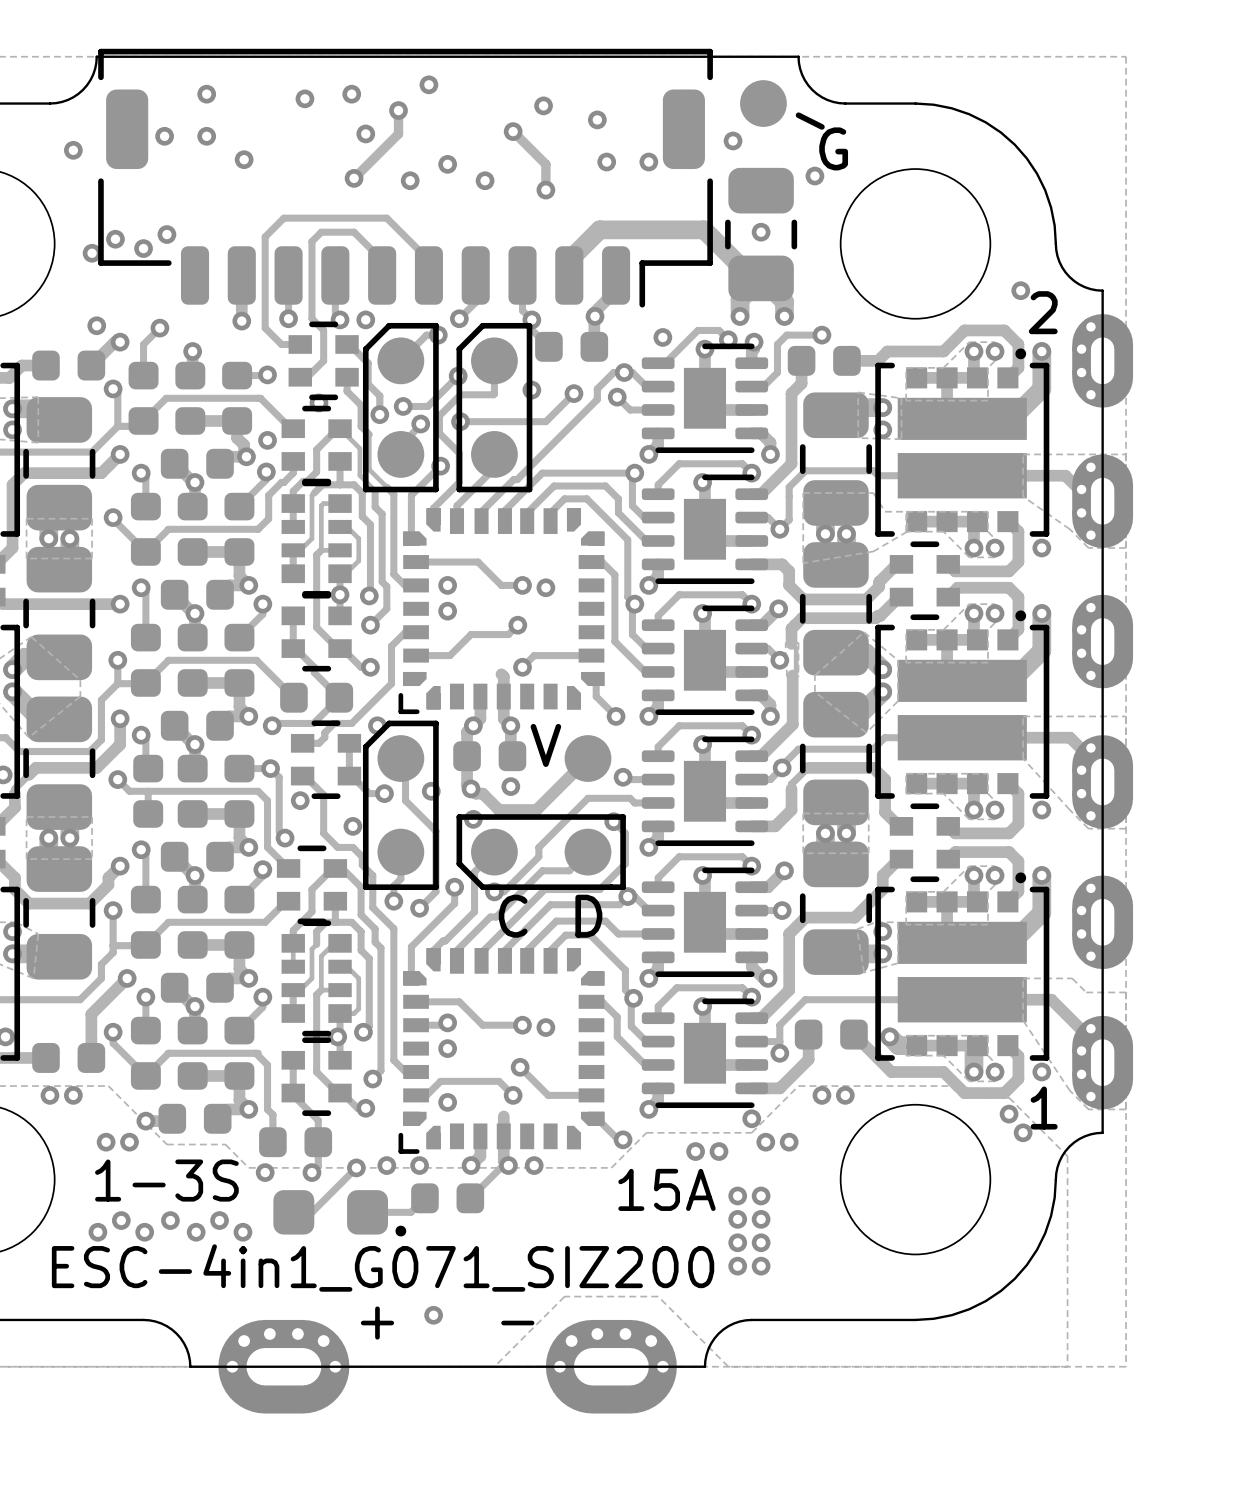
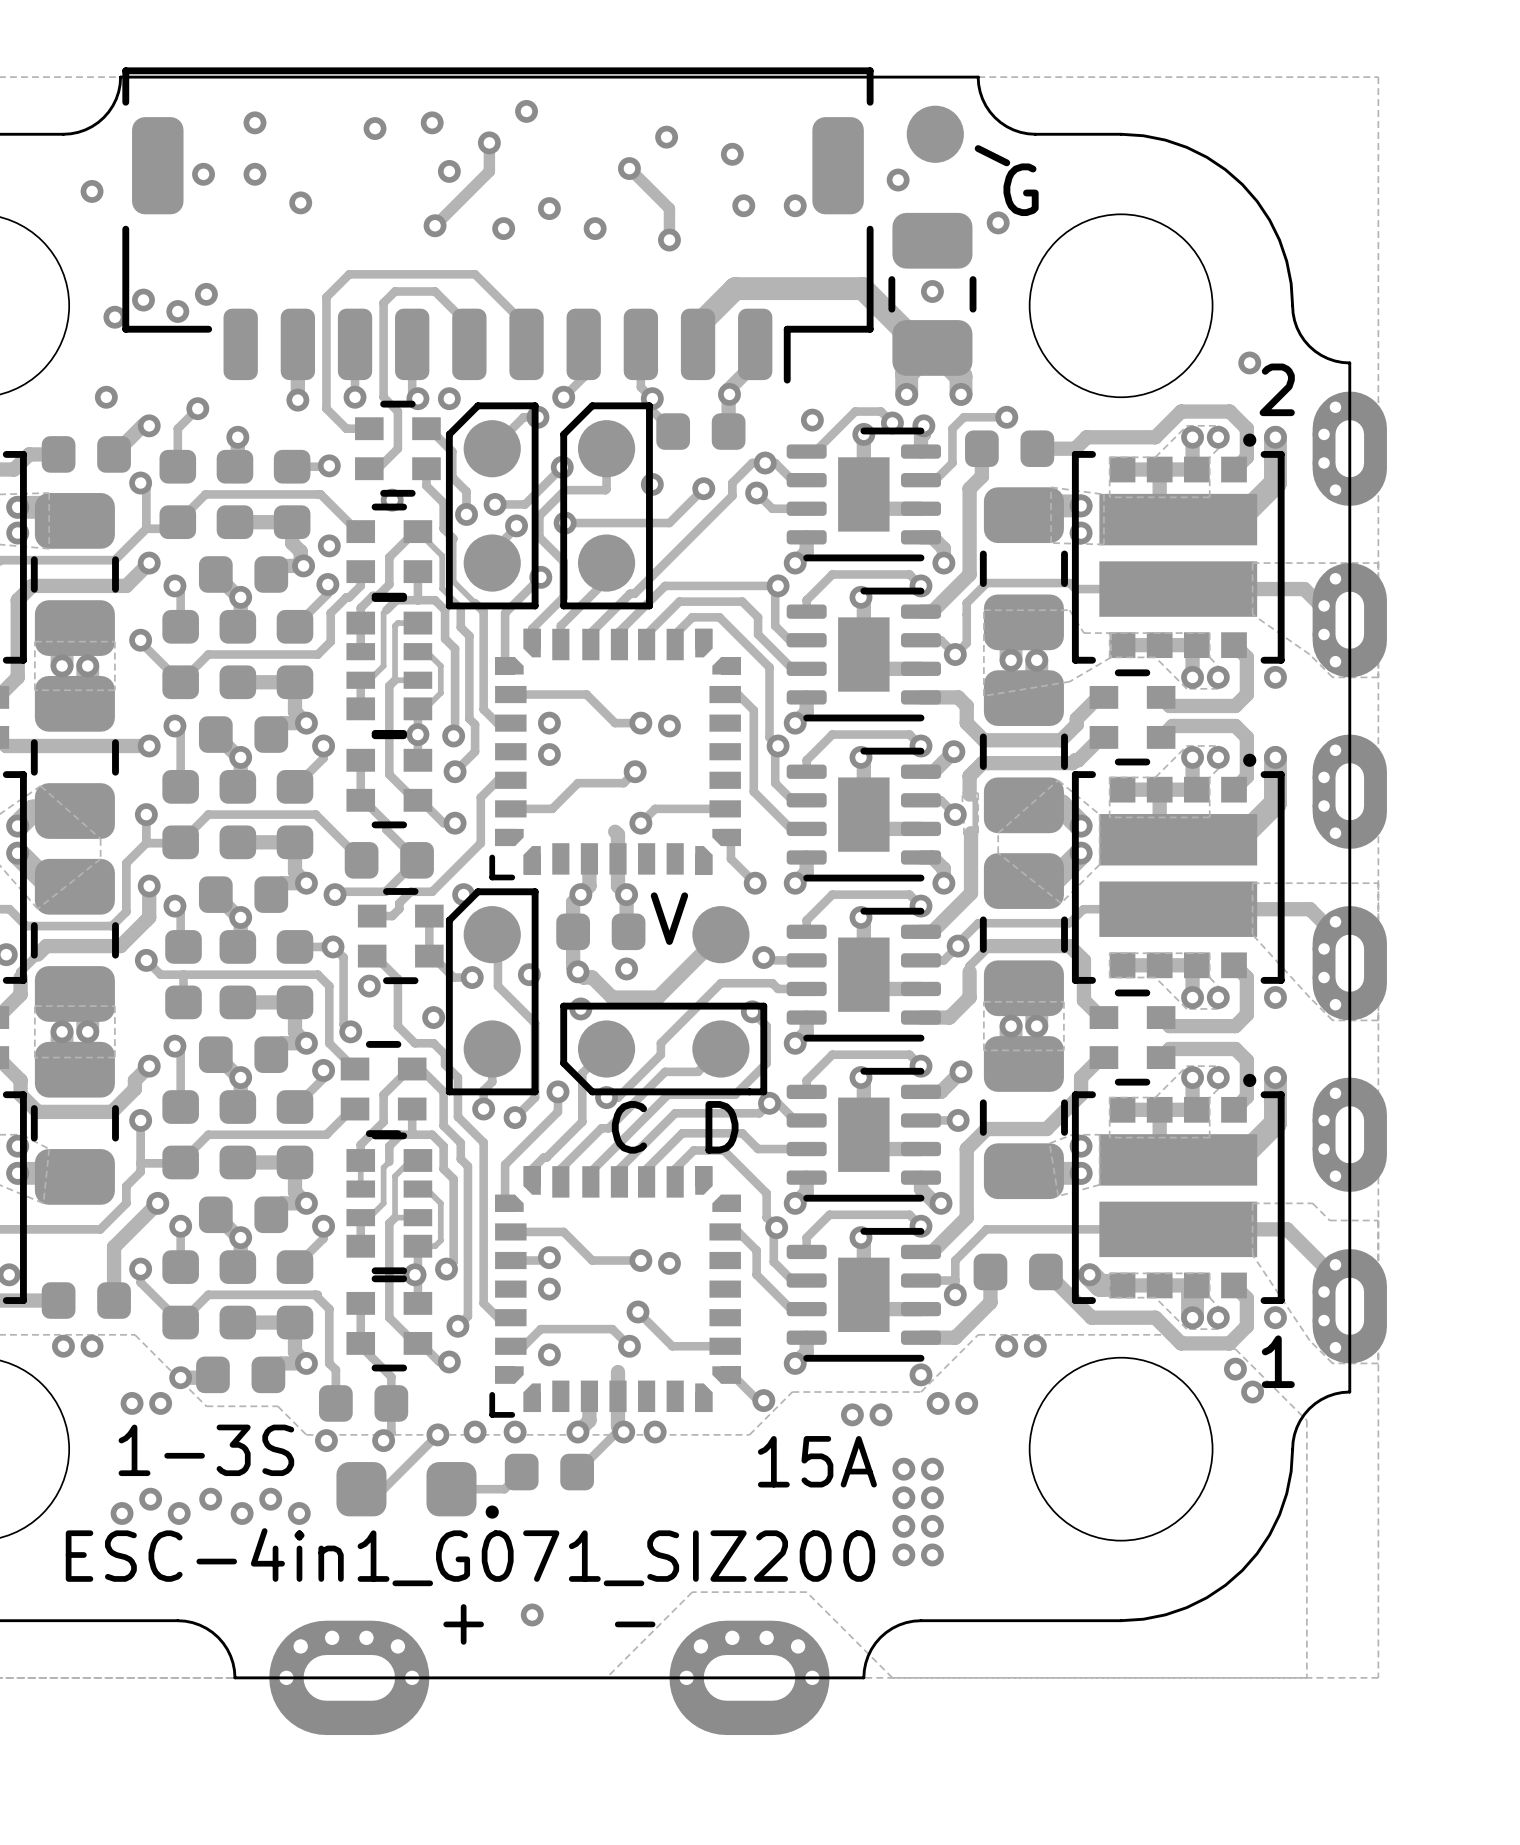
via position: (96, 325) -> (106, 397)

